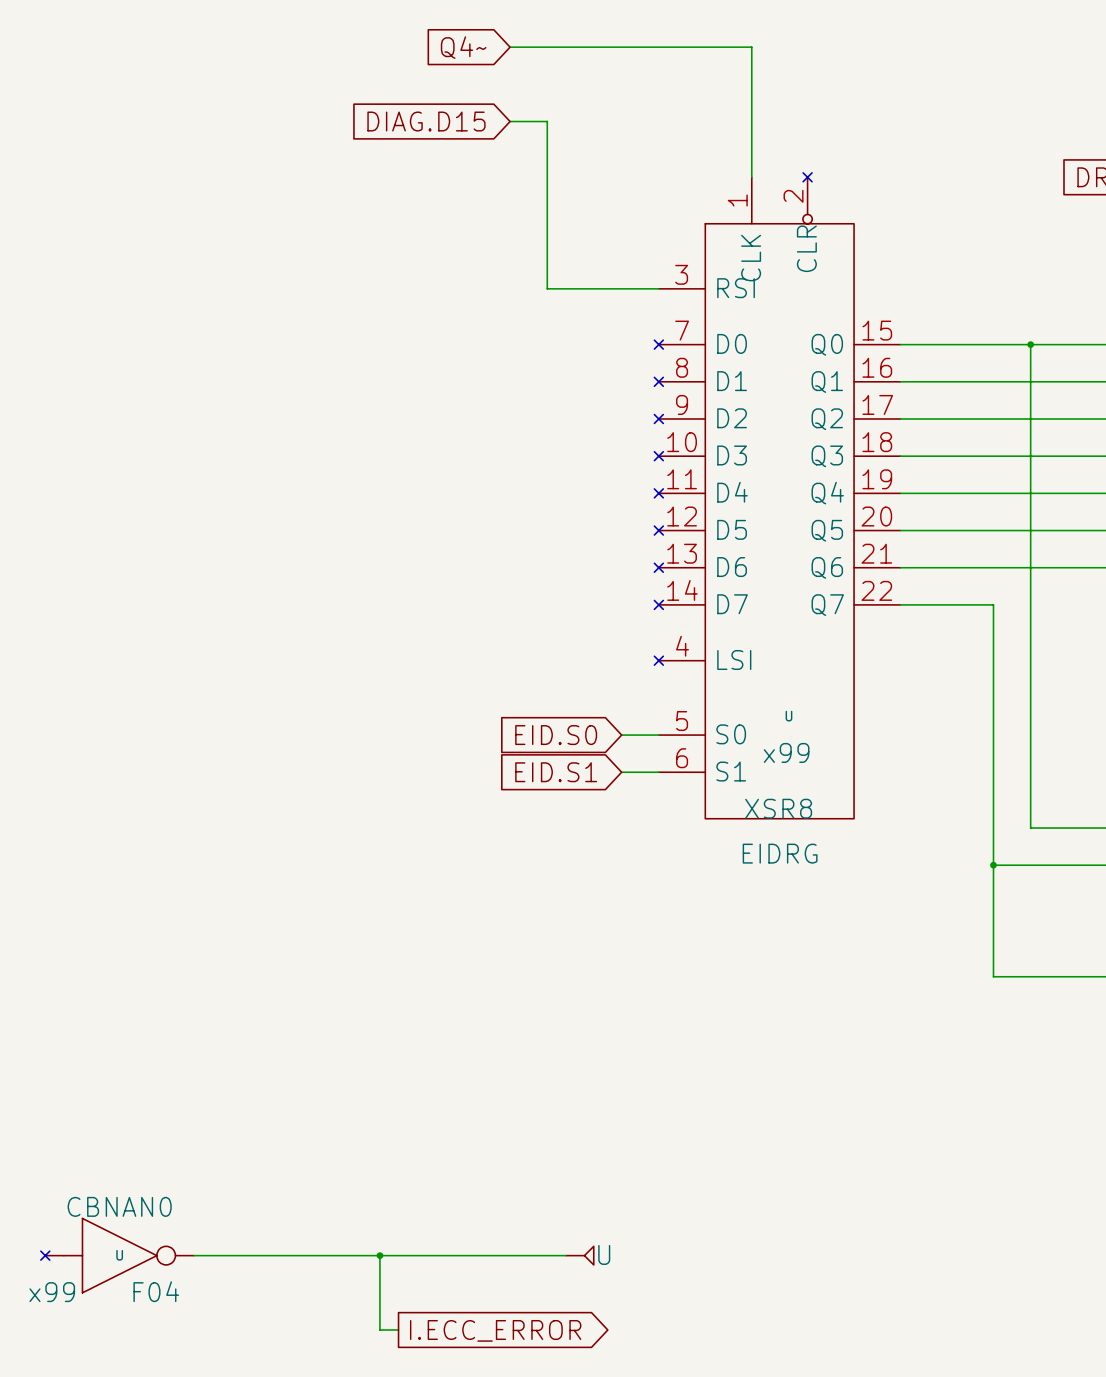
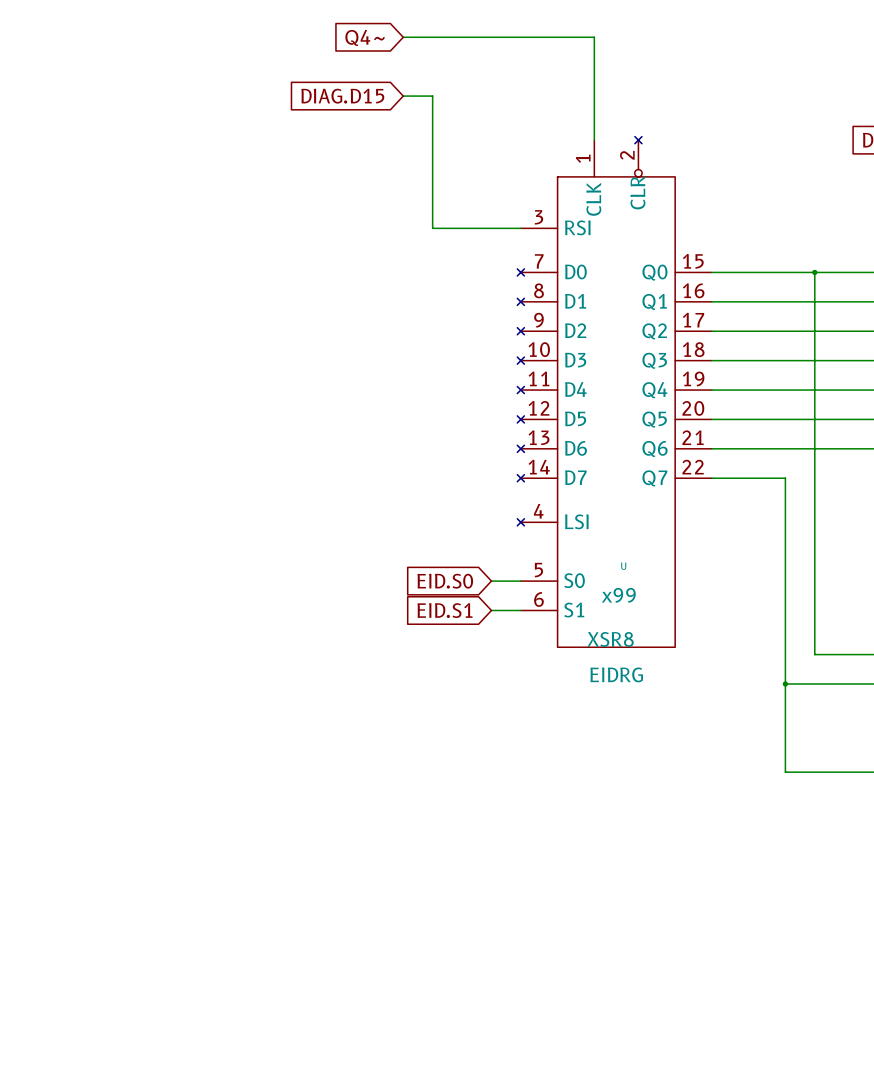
no-connect mark: (45, 1255) -> none
U: F04 (119, 1255) -> none
wire: (194, 1255) (565, 1255) -> none
wire: (379, 1255) (379, 1330) (398, 1330) -> none
junction: (379, 1255) -> none
U: (580, 1255) -> none
global label: I.ECC_ERROR (495, 1330) -> none

